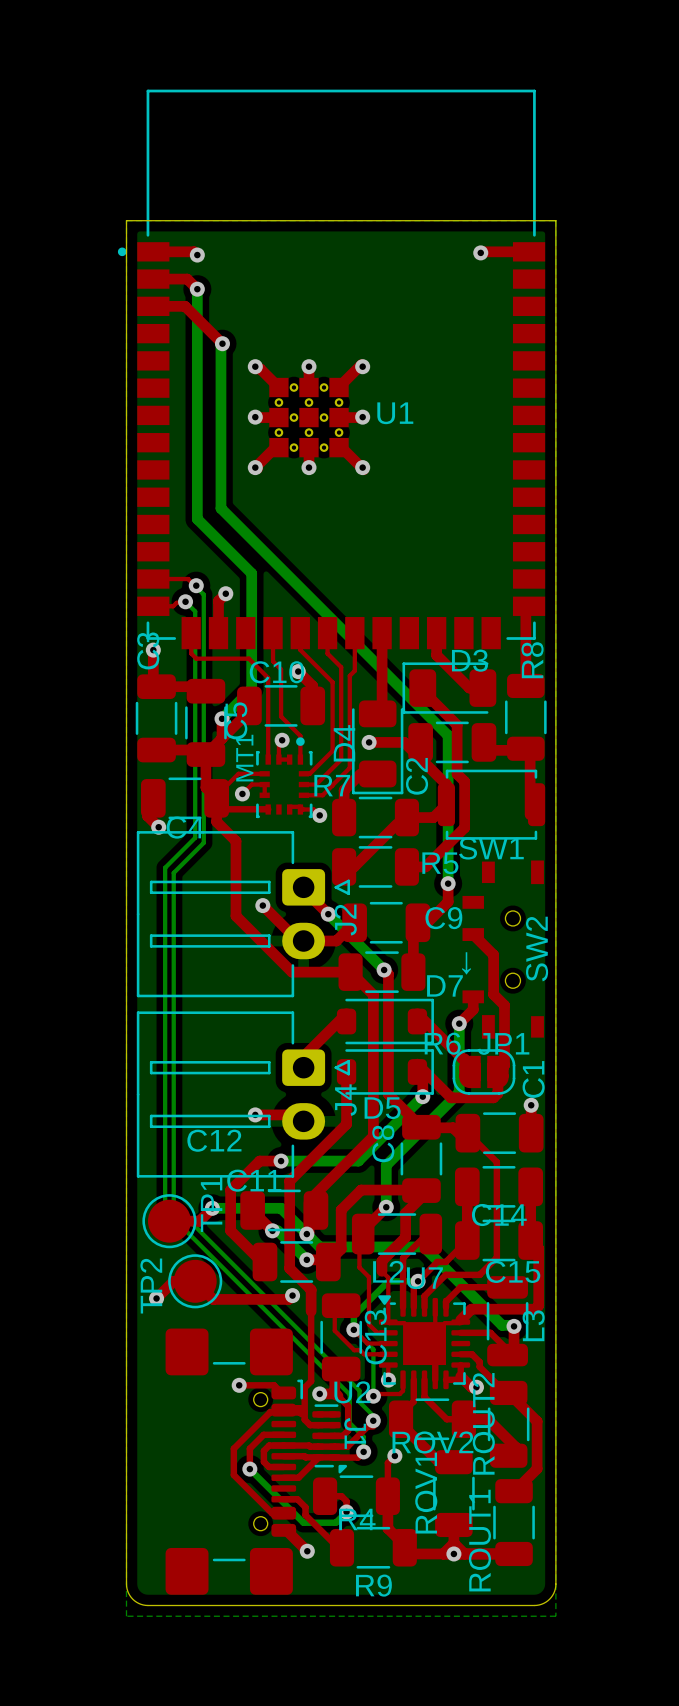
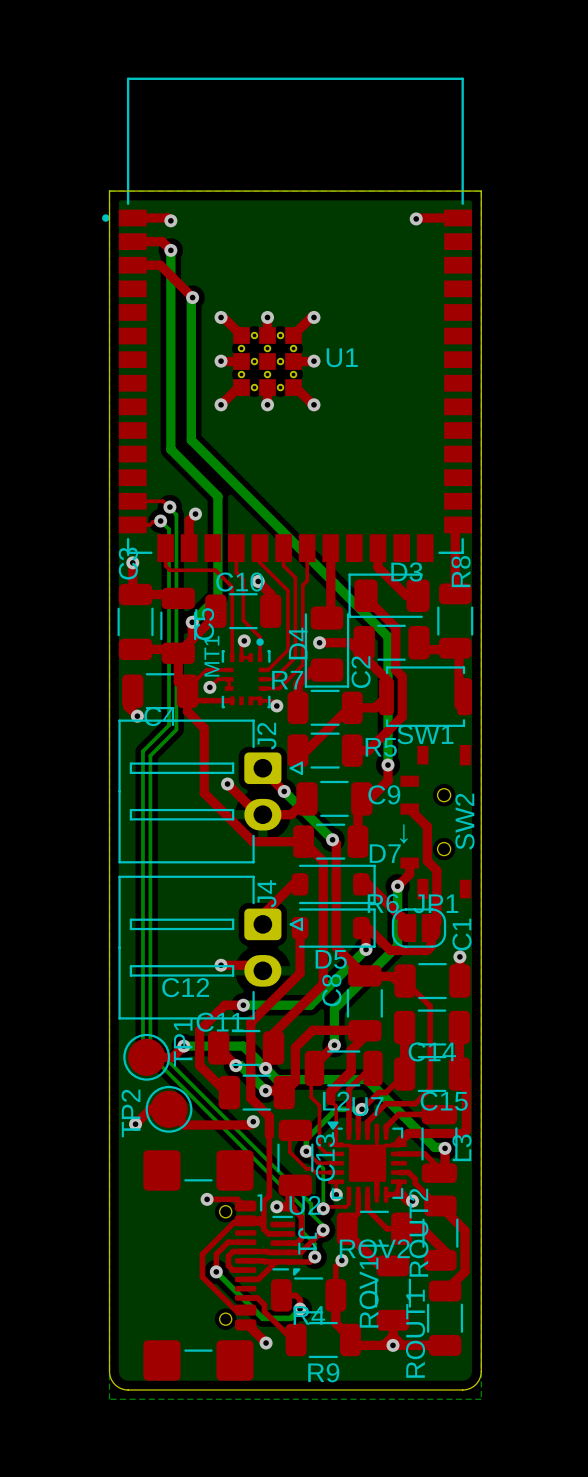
J2 name position: J2 (345, 920) -> J2 (266, 736)
J4 name position: J4 (345, 1100) -> J4 (266, 893)

